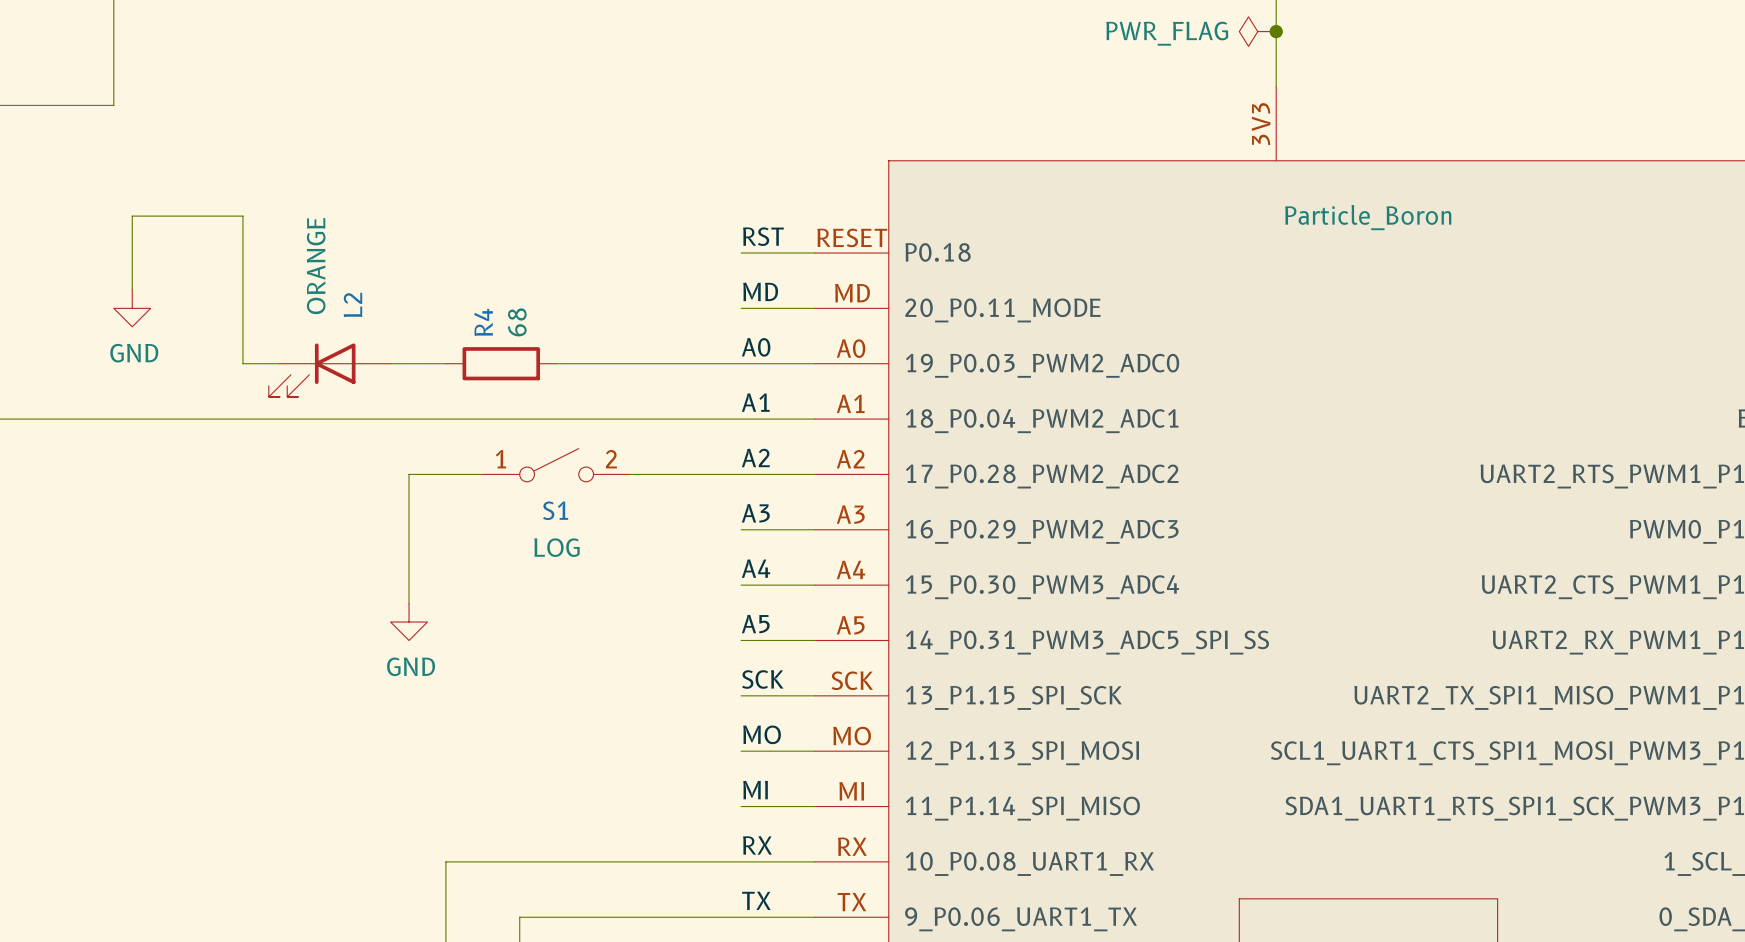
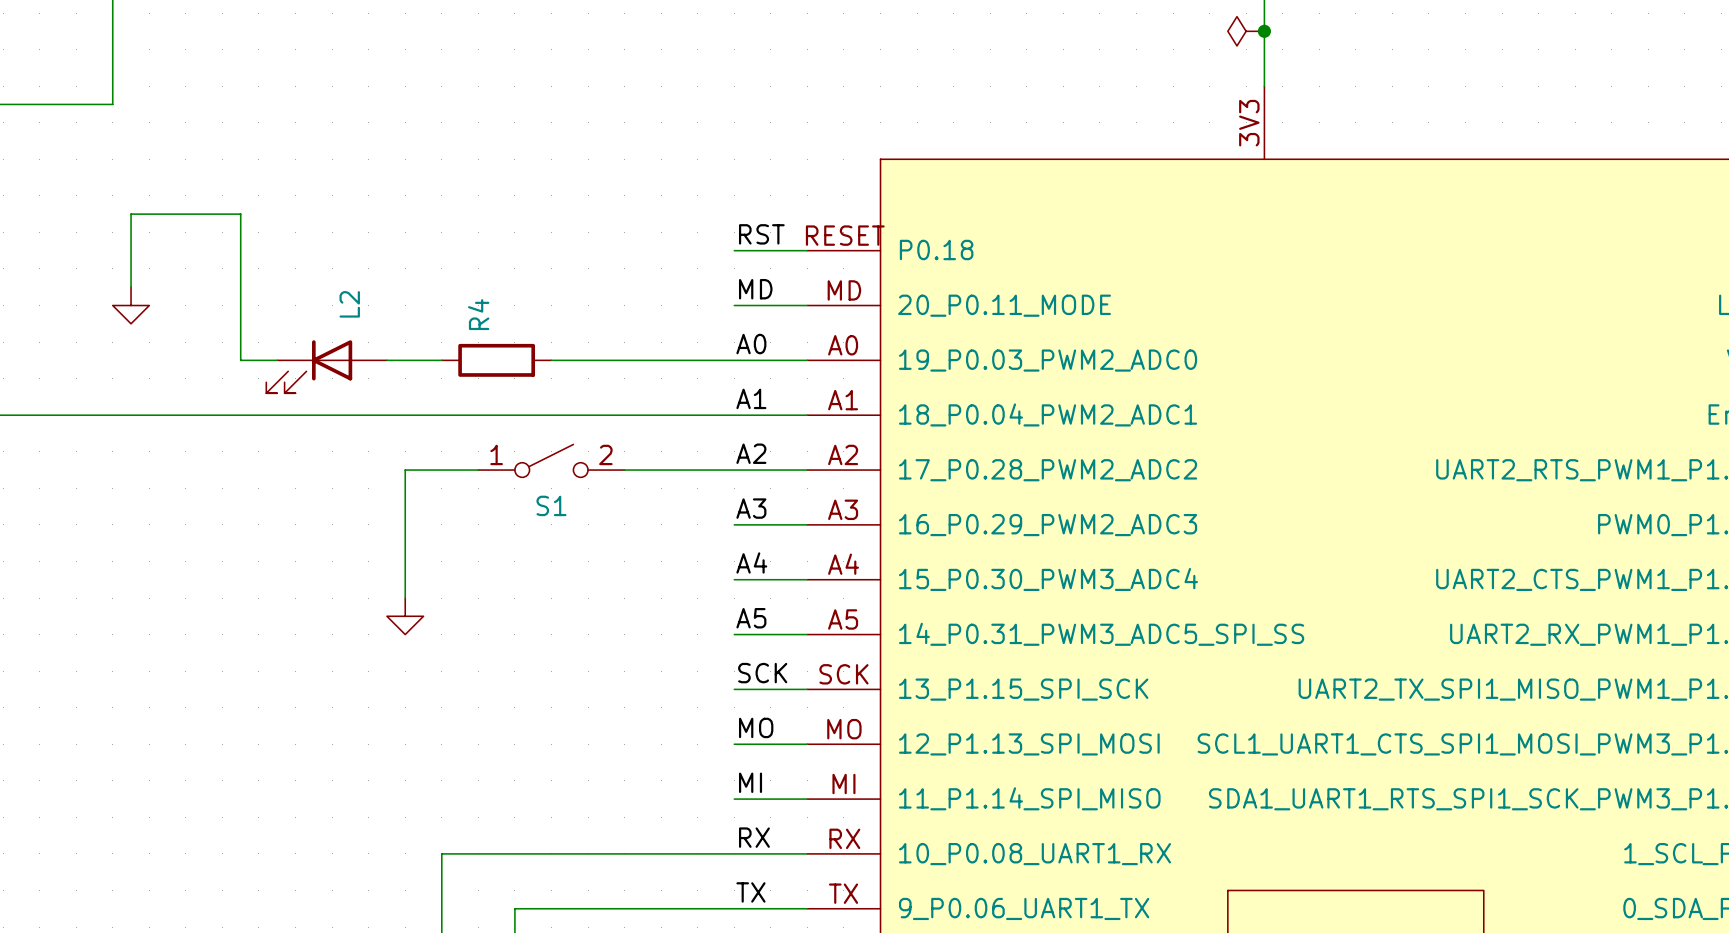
power symbol text: PWR_FLAG (1167, 33) -> none
part value: Particle_Boron (1368, 217) -> none
L2 value: ORANGE (316, 266) -> none
R4 value: 68 (517, 322) -> none
power symbol text: GND (134, 353) -> none
S1 value: LOG (556, 547) -> none
power symbol text: GND (411, 666) -> none

